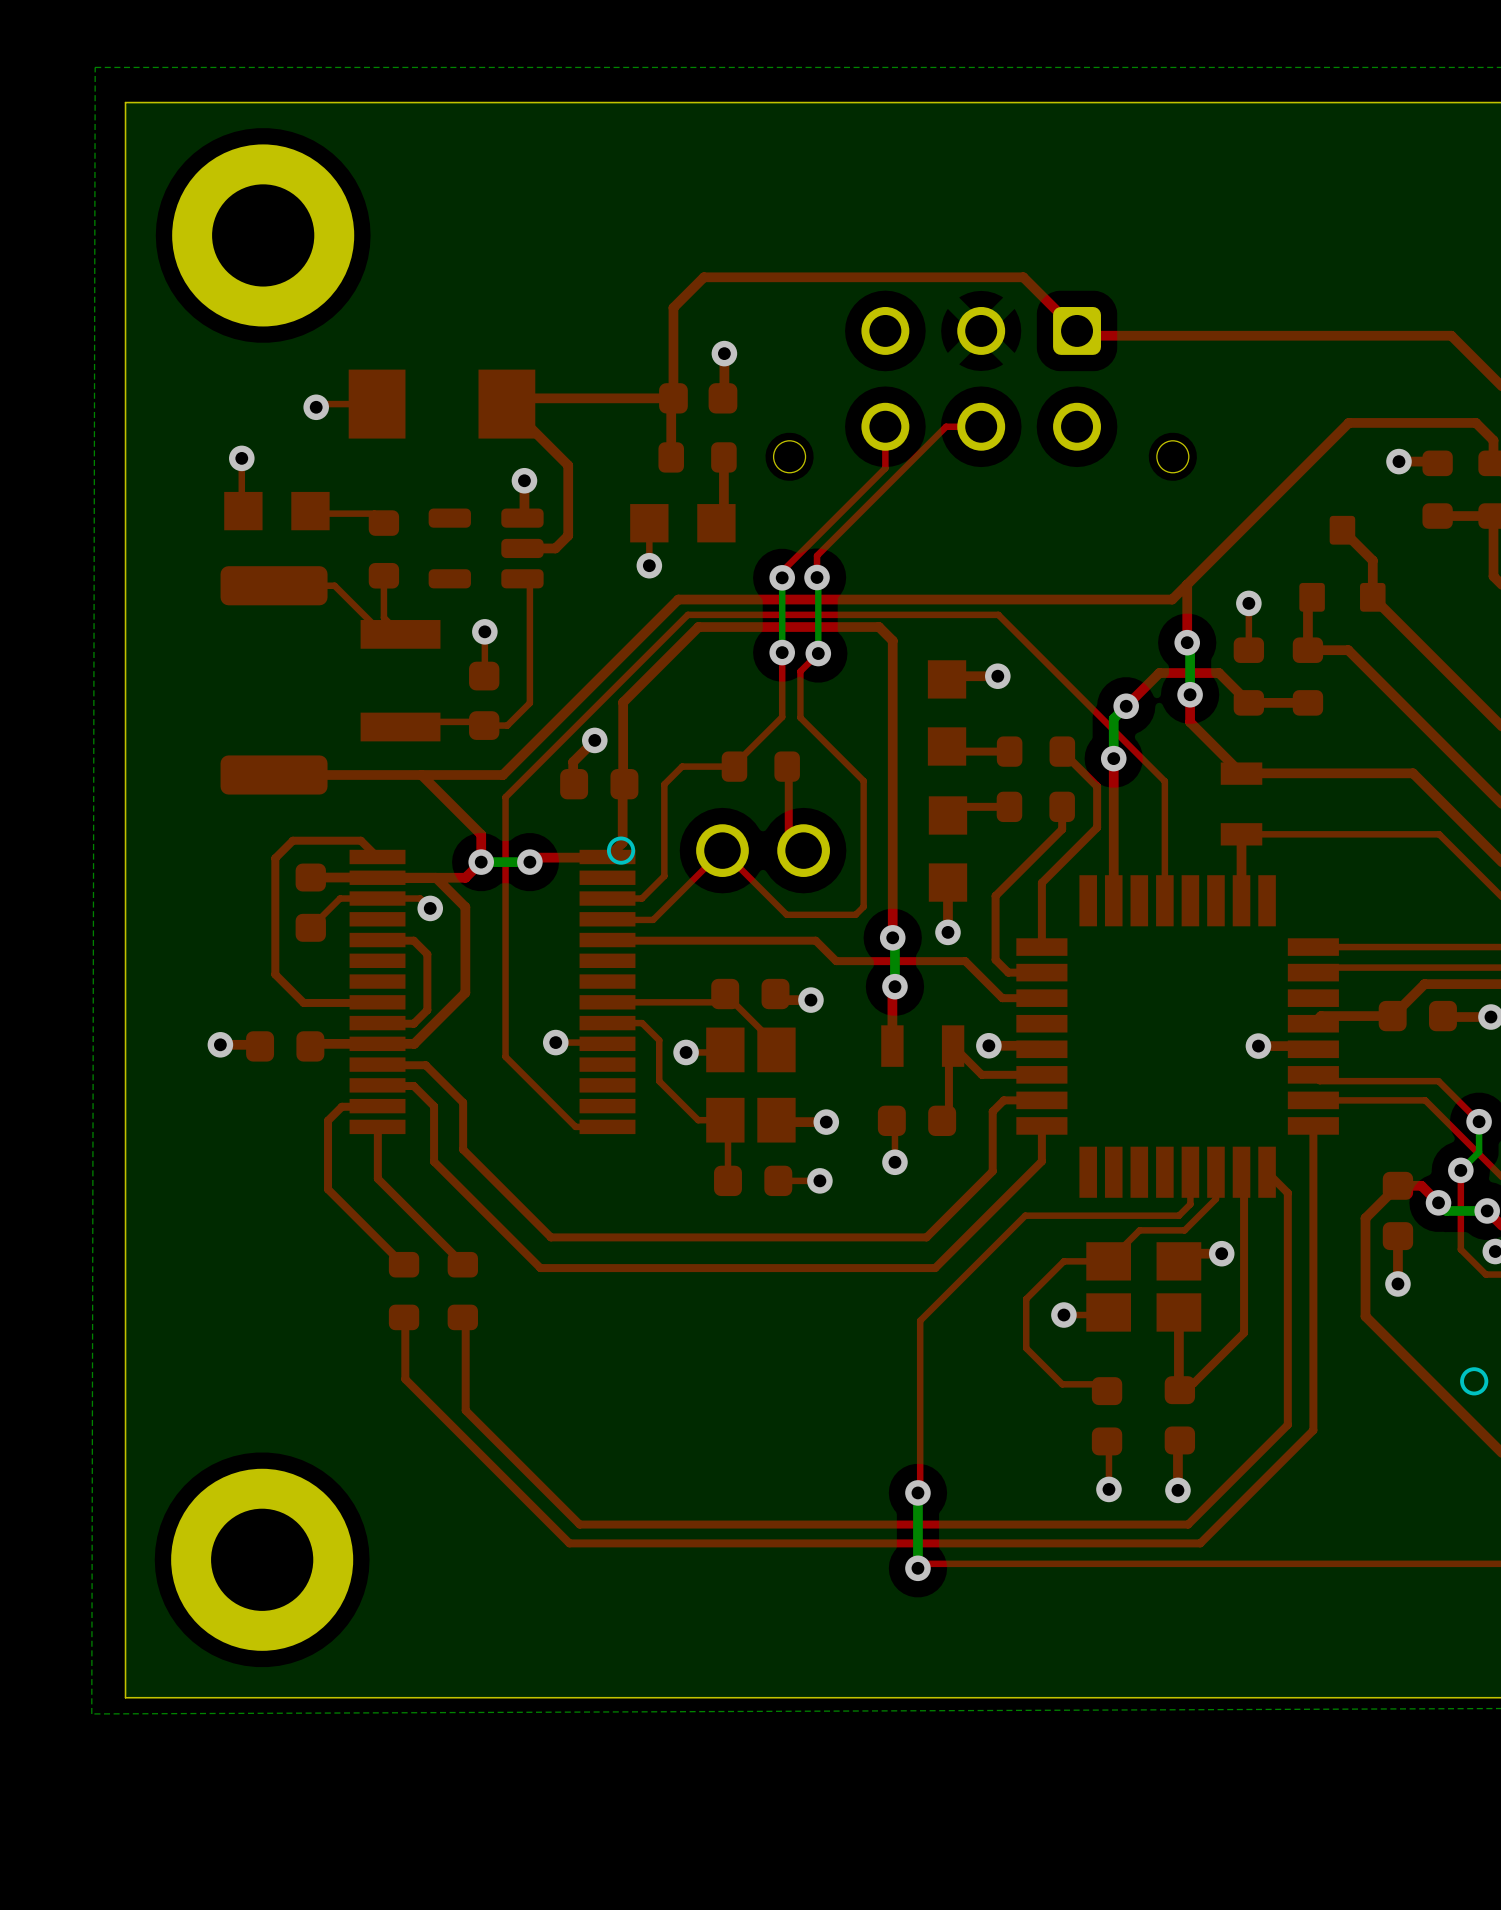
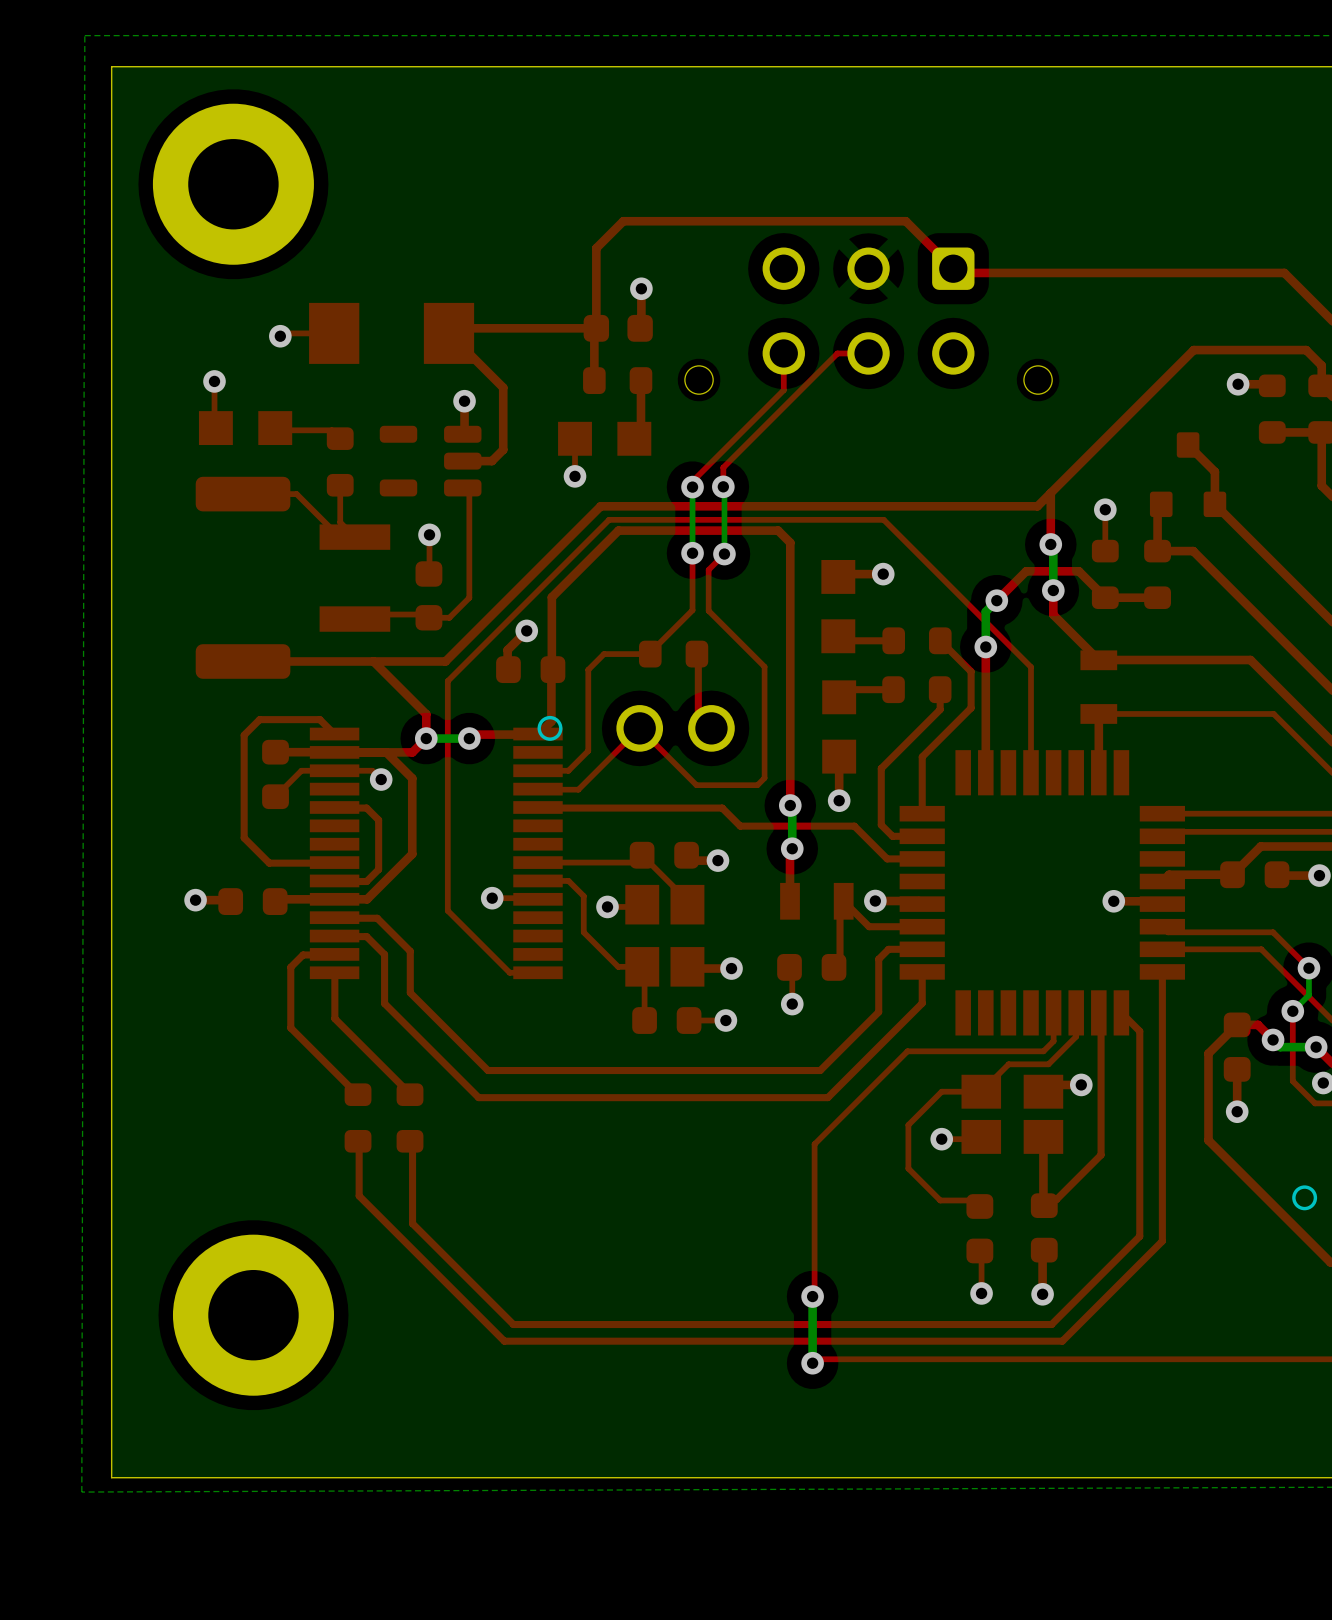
part position: (262, 1559) -> (253, 1315)

